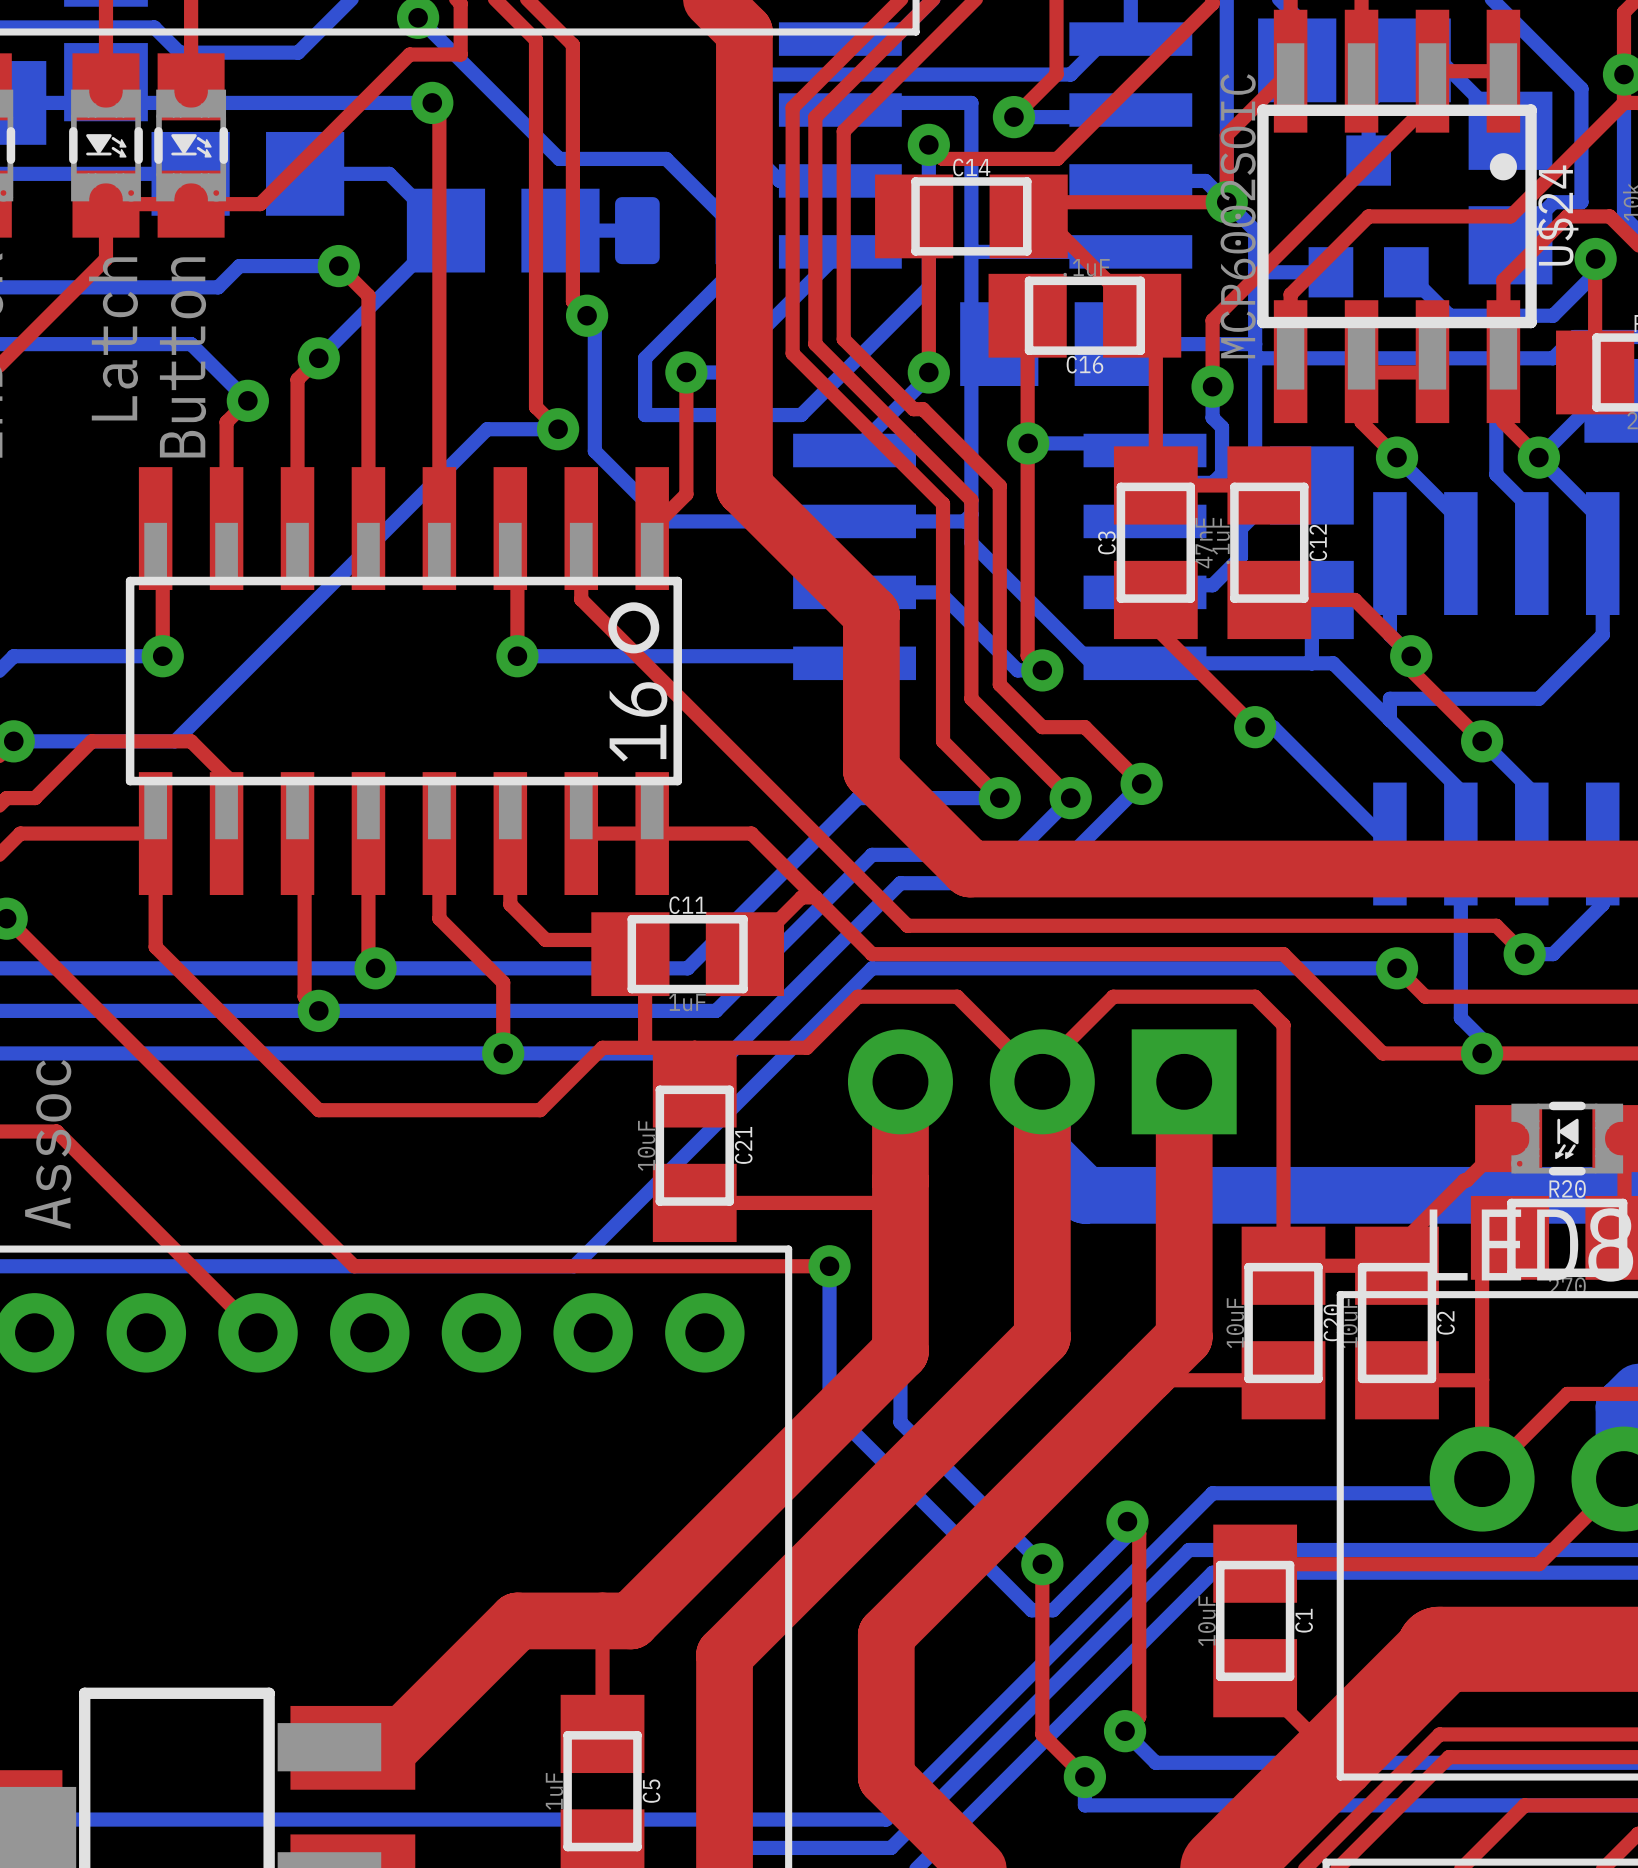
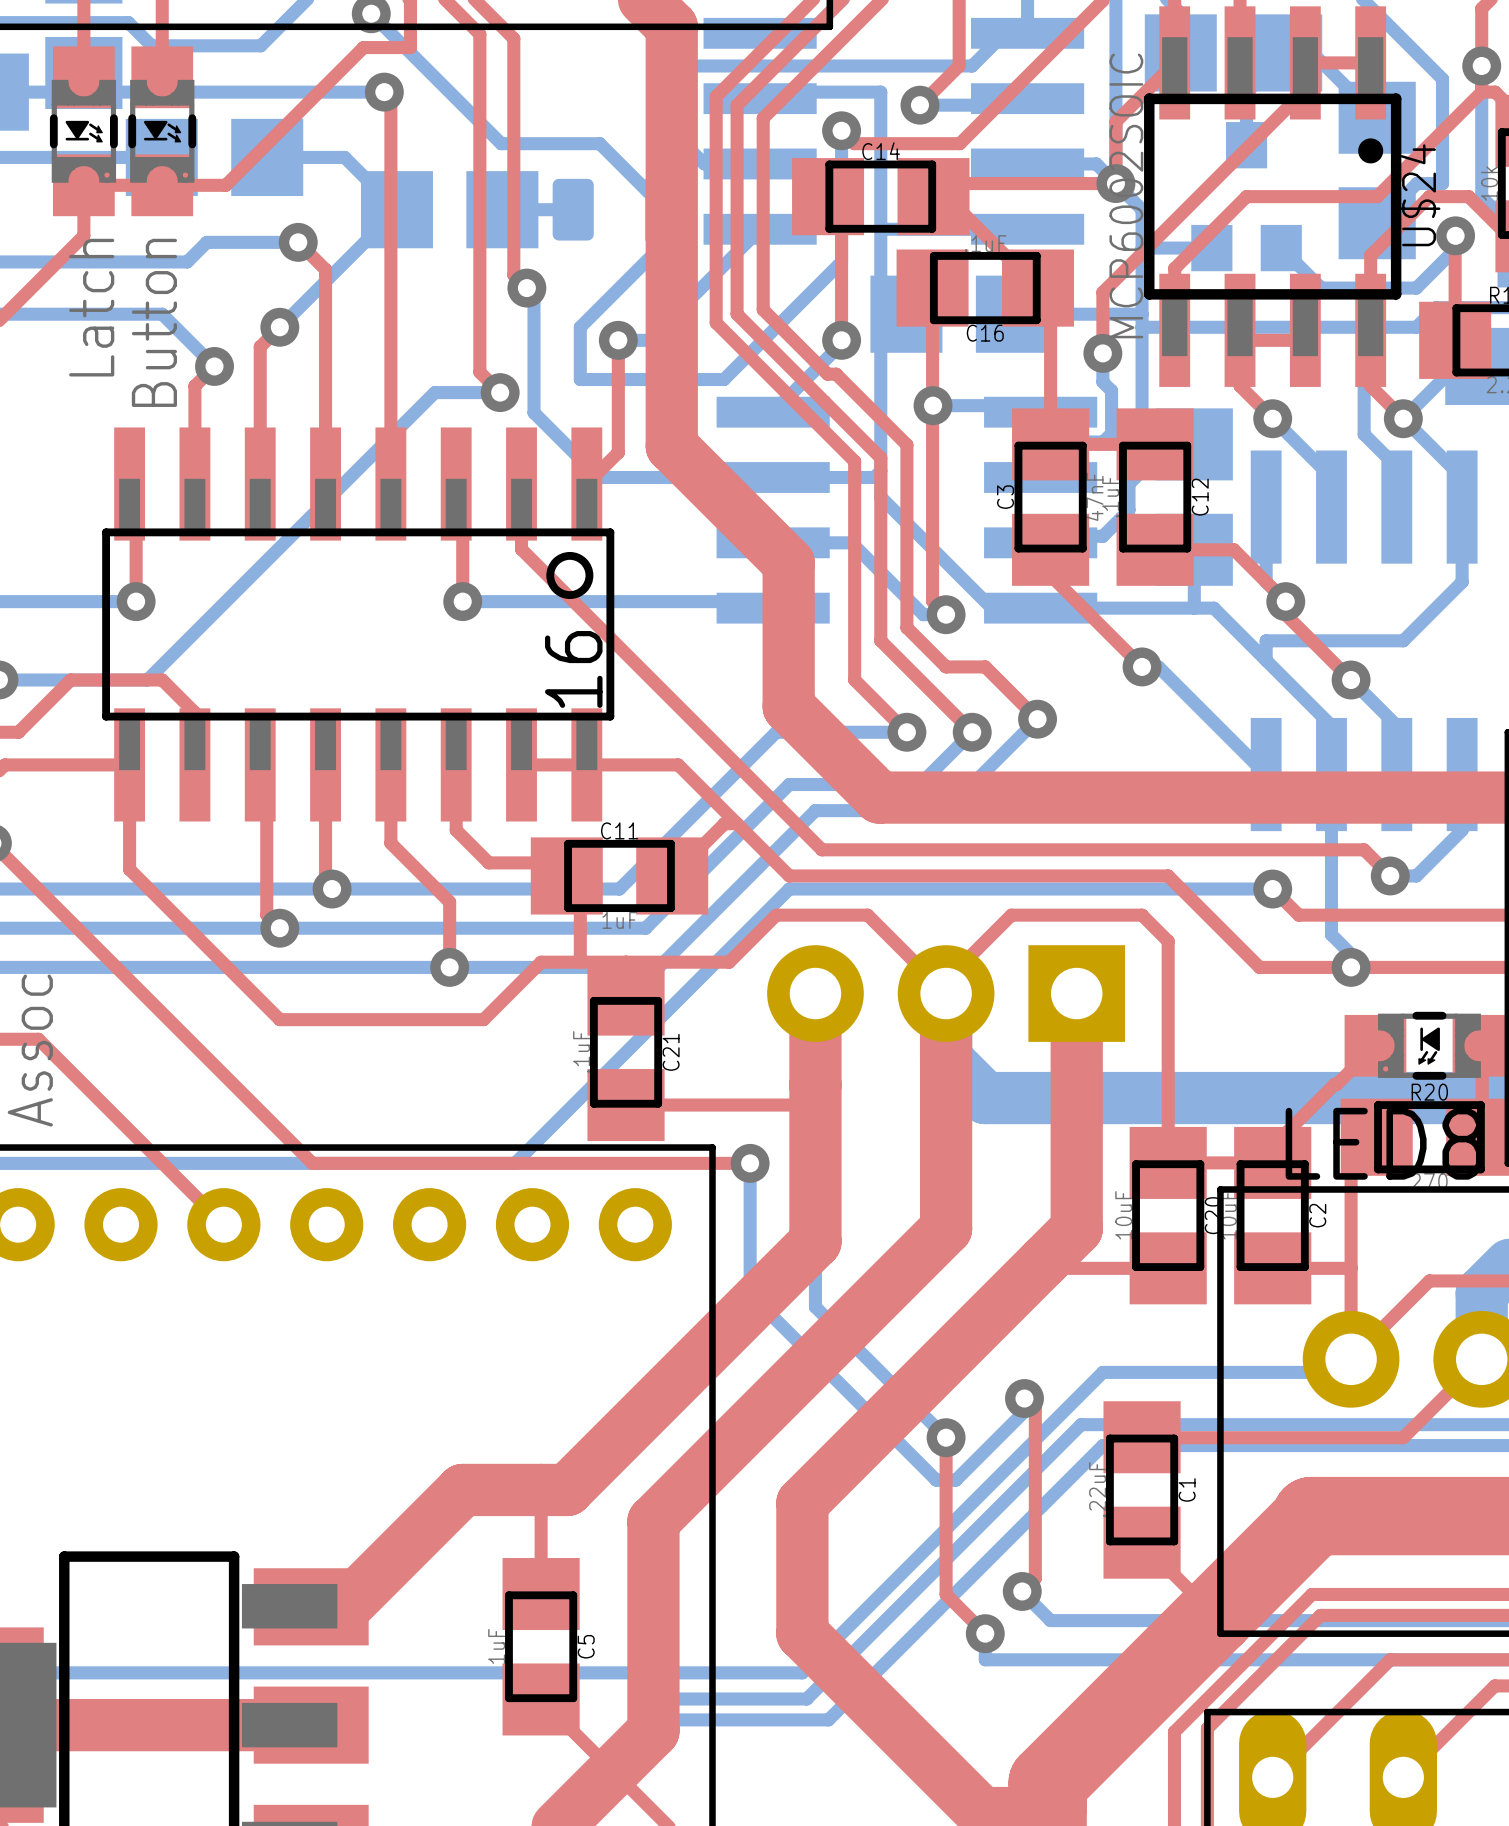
C21 value: 10uF (646, 1145) -> .1uF (581, 1051)
C1 value: 10uF (1206, 1621) -> .22uF (1097, 1489)

